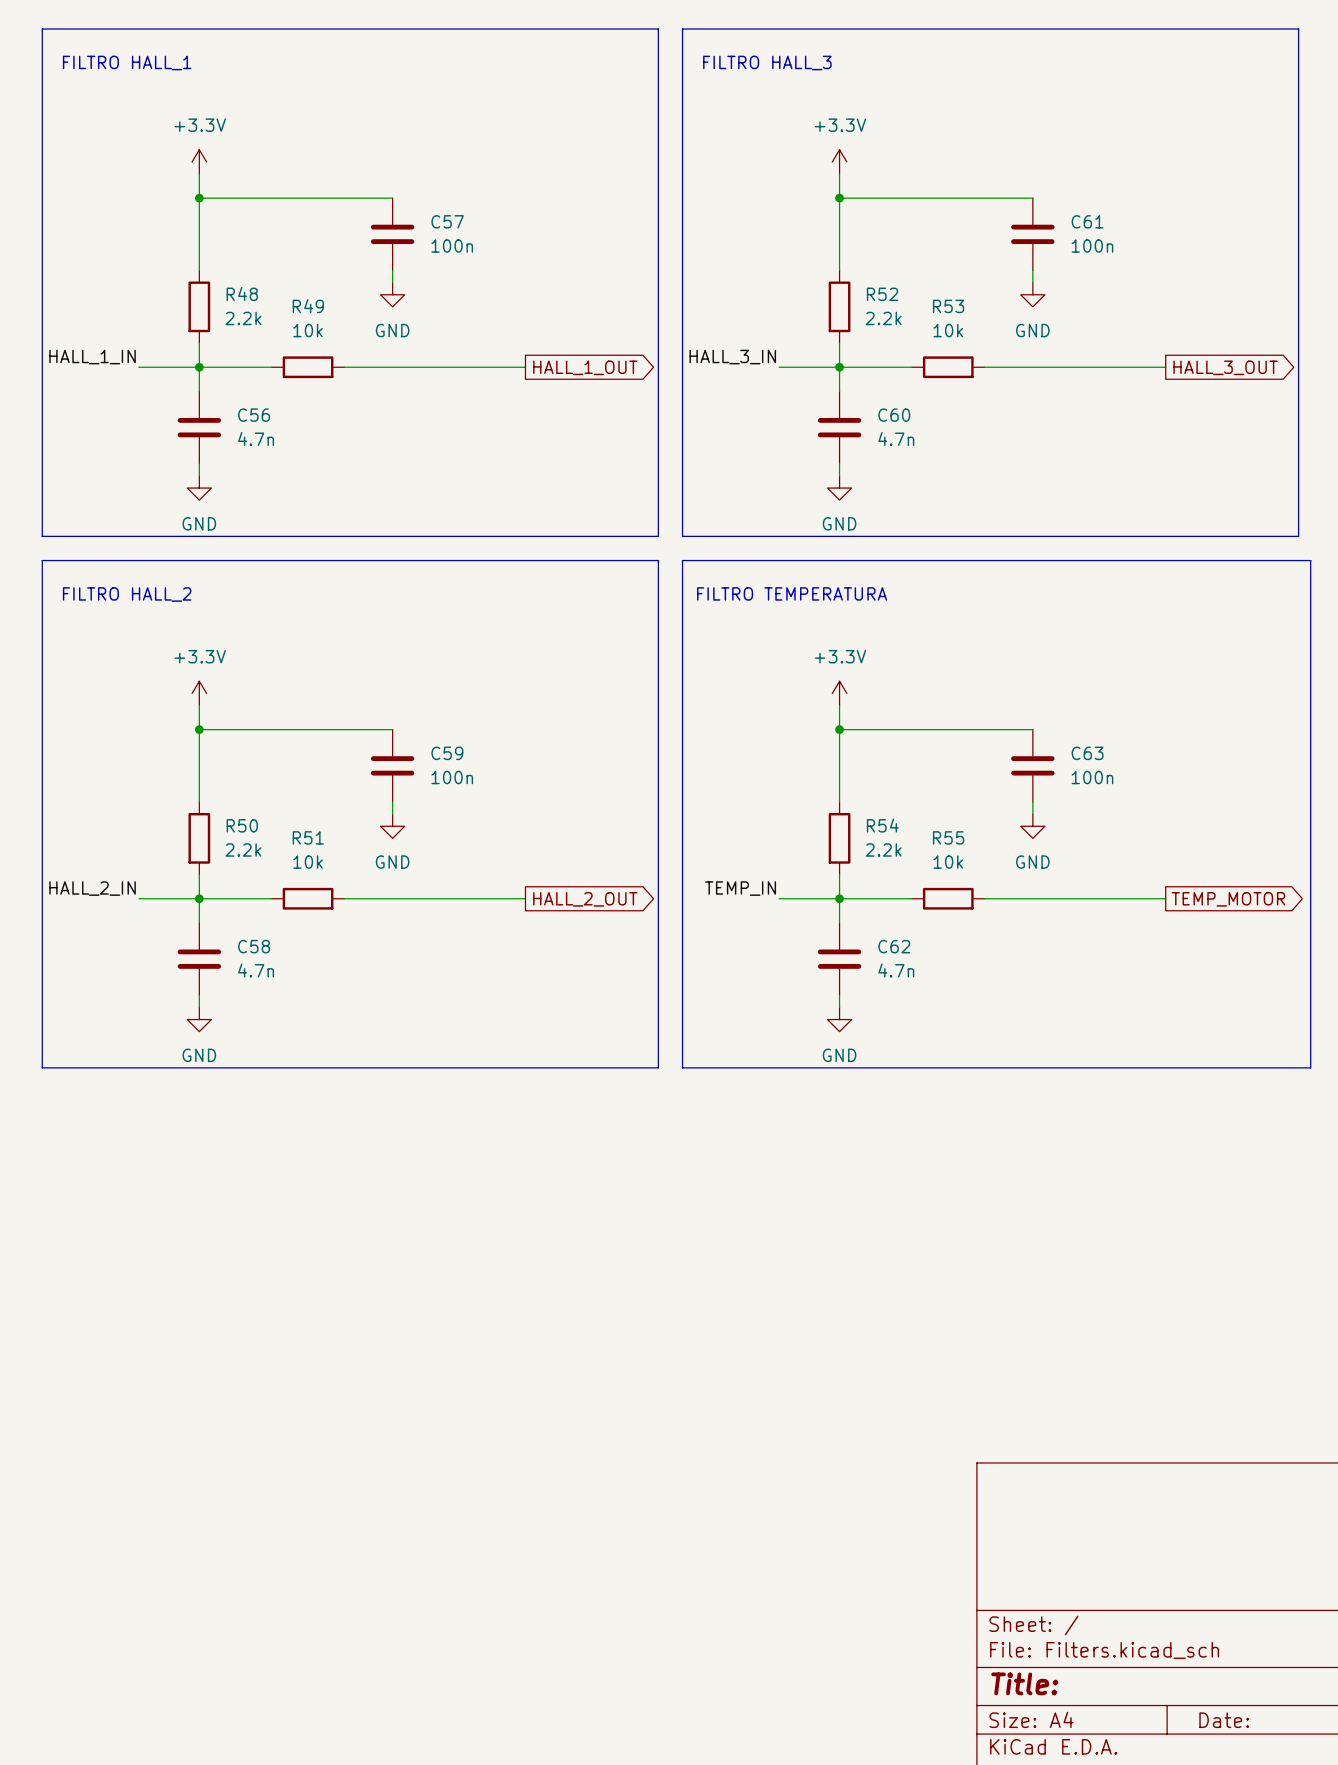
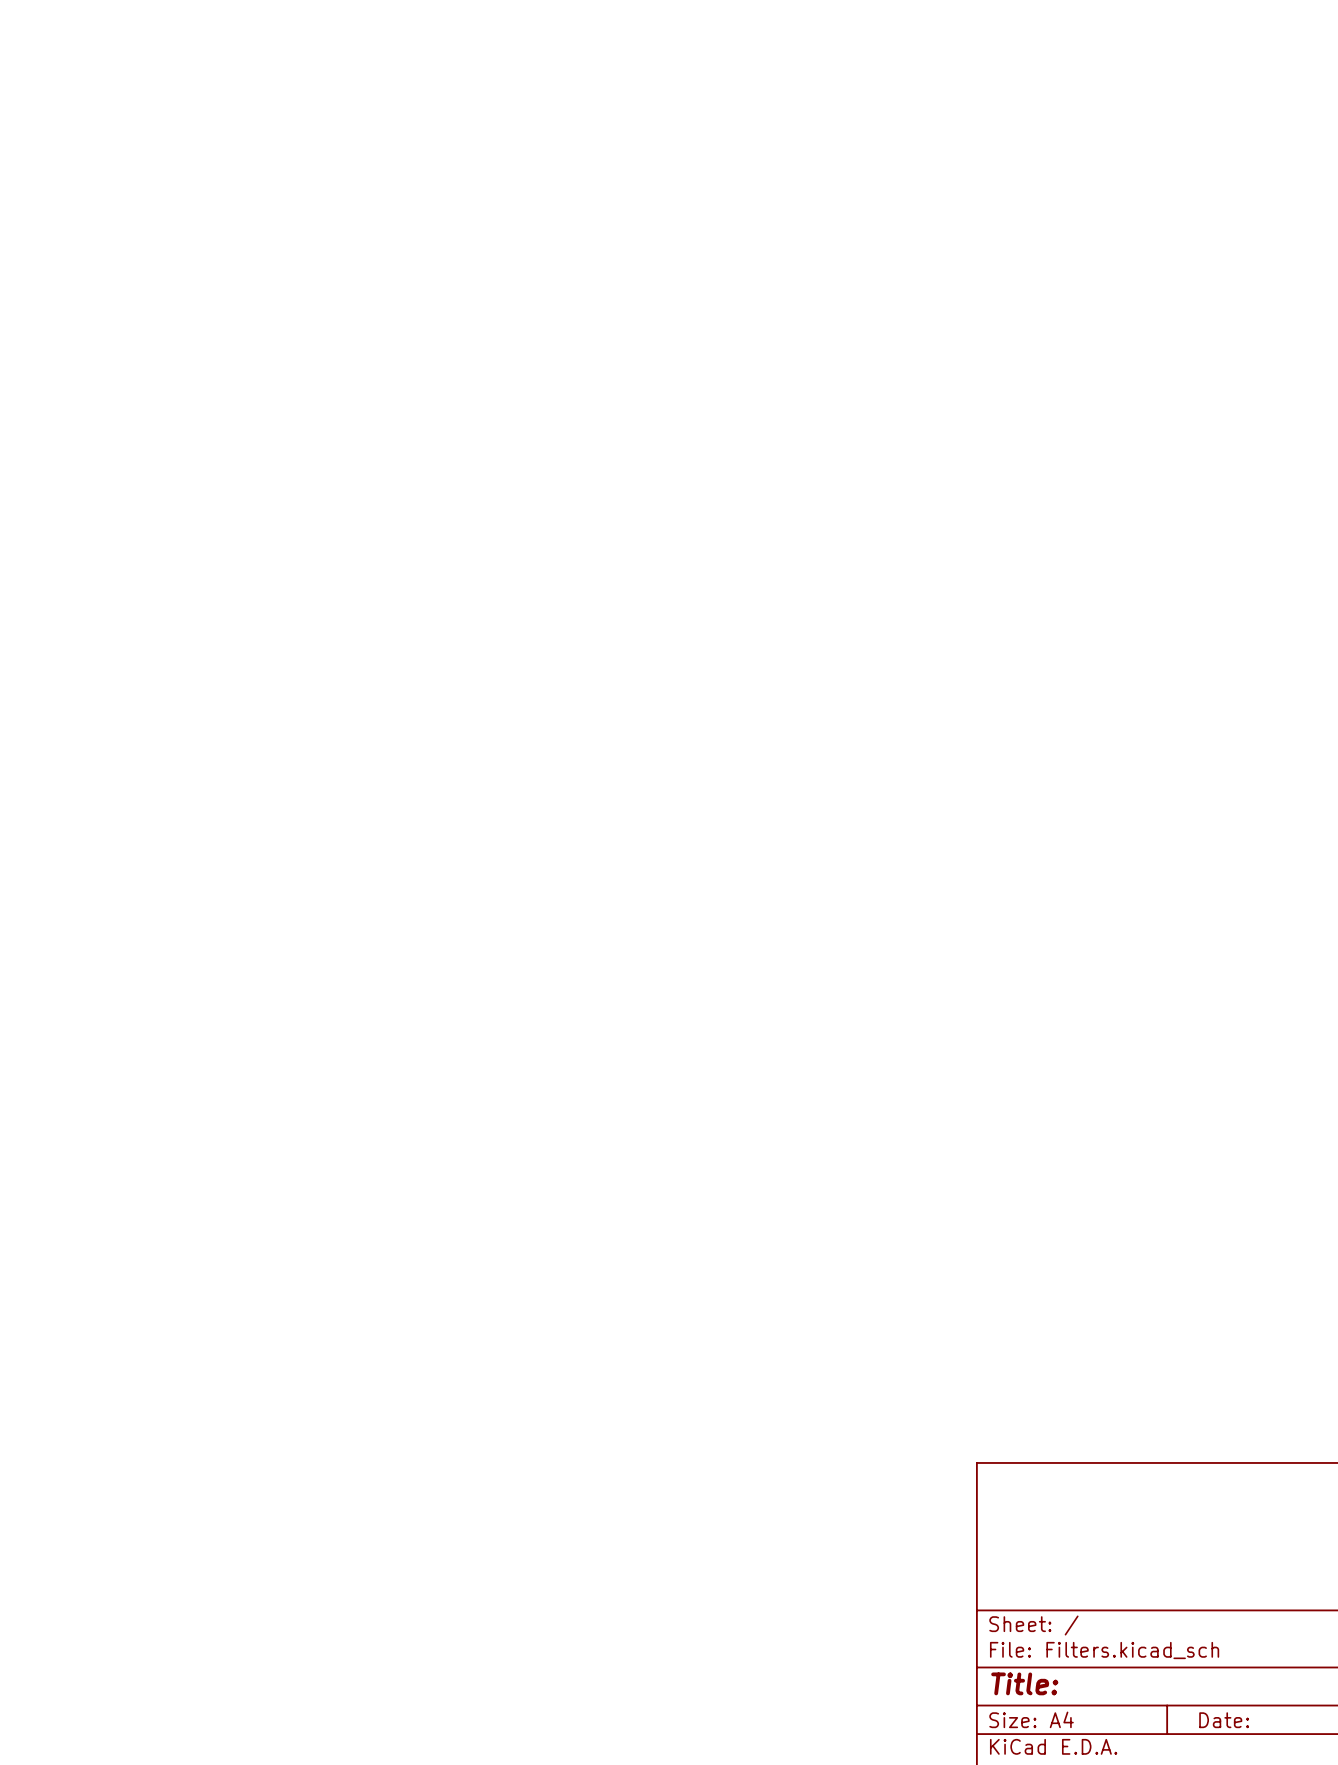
line: (42, 29) (658, 29) (658, 536) (42, 536) (42, 29) -> none
line: (682, 29) (682, 536) (1298, 536) (1298, 29) (682, 29) -> none
text: FILTRO HALL_1 (127, 63) -> none
text: FILTRO HALL_3 (767, 63) -> none
power symbol: +3.3V (199, 161) -> none
power symbol: +3.3V (839, 161) -> none
wire: (199, 173) (199, 270) -> none
wire: (839, 173) (839, 270) -> none
wire: (199, 198) (392, 198) -> none
junction: (199, 198) -> none
wire: (839, 198) (1032, 198) -> none
junction: (839, 198) -> none
C57: 100n (392, 234) -> none
C61: 100n (1032, 234) -> none
wire: (392, 270) (392, 282) -> none
wire: (1032, 270) (1032, 282) -> none
power symbol: GND (392, 294) -> none
power symbol: GND (1032, 294) -> none
R48: 2.2k (199, 306) -> none
R52: 2.2k (839, 306) -> none
wire: (199, 343) (199, 391) -> none
wire: (839, 343) (839, 391) -> none
label: HALL_1_IN (92, 357) -> none
label: HALL_3_IN (732, 357) -> none
wire: (138, 367) (271, 367) -> none
junction: (199, 367) -> none
R49: 10k (308, 367) -> none
wire: (344, 367) (525, 367) -> none
global label: HALL_1_OUT (585, 367) -> none
wire: (779, 367) (912, 367) -> none
junction: (839, 367) -> none
R53: 10k (948, 367) -> none
wire: (984, 367) (1165, 367) -> none
global label: HALL_3_OUT (1225, 367) -> none
C56: 4.7n (199, 427) -> none
C60: 4.7n (839, 427) -> none
wire: (199, 463) (199, 475) -> none
wire: (839, 463) (839, 475) -> none
power symbol: GND (199, 488) -> none
power symbol: GND (839, 488) -> none
line: (42, 560) (658, 560) (658, 1067) (42, 1067) (42, 560) -> none
line: (682, 560) (1310, 560) (1310, 1067) (682, 1067) (682, 560) -> none
text: FILTRO TEMPERATURA (792, 593) -> none
text: FILTRO HALL_2 (127, 594) -> none
power symbol: +3.3V (199, 693) -> none
power symbol: +3.3V (839, 693) -> none
wire: (199, 705) (199, 802) -> none
wire: (839, 705) (839, 802) -> none
wire: (199, 729) (392, 729) -> none
junction: (199, 729) -> none
wire: (839, 729) (1032, 729) -> none
junction: (839, 729) -> none
C59: 100n (392, 765) -> none
C63: 100n (1032, 765) -> none
wire: (392, 802) (392, 814) -> none
wire: (1032, 802) (1032, 814) -> none
power symbol: GND (392, 826) -> none
power symbol: GND (1032, 826) -> none
R50: 2.2k (199, 838) -> none
R54: 2.2k (839, 838) -> none
wire: (199, 874) (199, 922) -> none
wire: (839, 874) (839, 922) -> none
label: HALL_2_IN (92, 888) -> none
label: TEMP_IN (740, 888) -> none
wire: (138, 898) (271, 898) -> none
junction: (199, 898) -> none
R51: 10k (308, 898) -> none
wire: (344, 898) (525, 898) -> none
wire: (779, 898) (912, 898) -> none
junction: (839, 898) -> none
R55: 10k (948, 898) -> none
wire: (984, 898) (1165, 898) -> none
global label: HALL_2_OUT (585, 899) -> none
global label: TEMP_MOTOR (1228, 899) -> none
C58: 4.7n (199, 959) -> none
C62: 4.7n (839, 959) -> none
wire: (199, 995) (199, 1007) -> none
wire: (839, 995) (839, 1007) -> none
power symbol: GND (199, 1019) -> none
power symbol: GND (839, 1019) -> none

